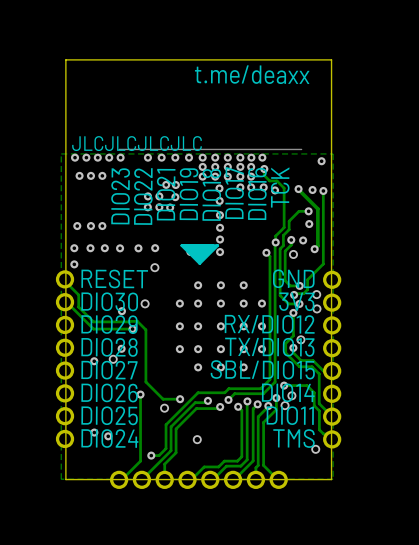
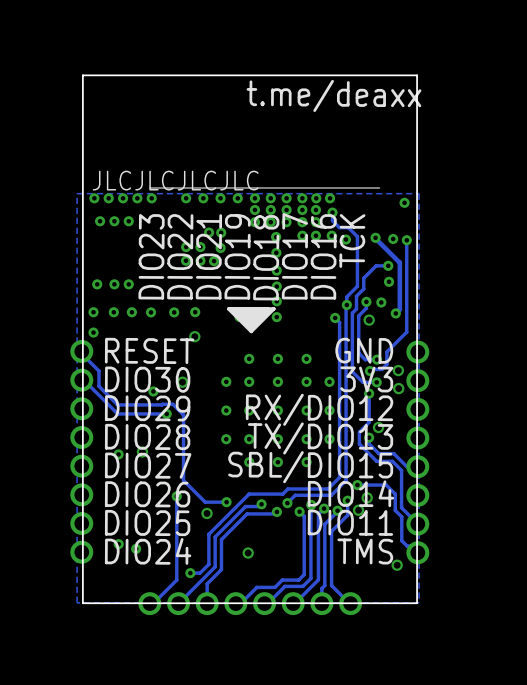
via: (121, 348) -> none

